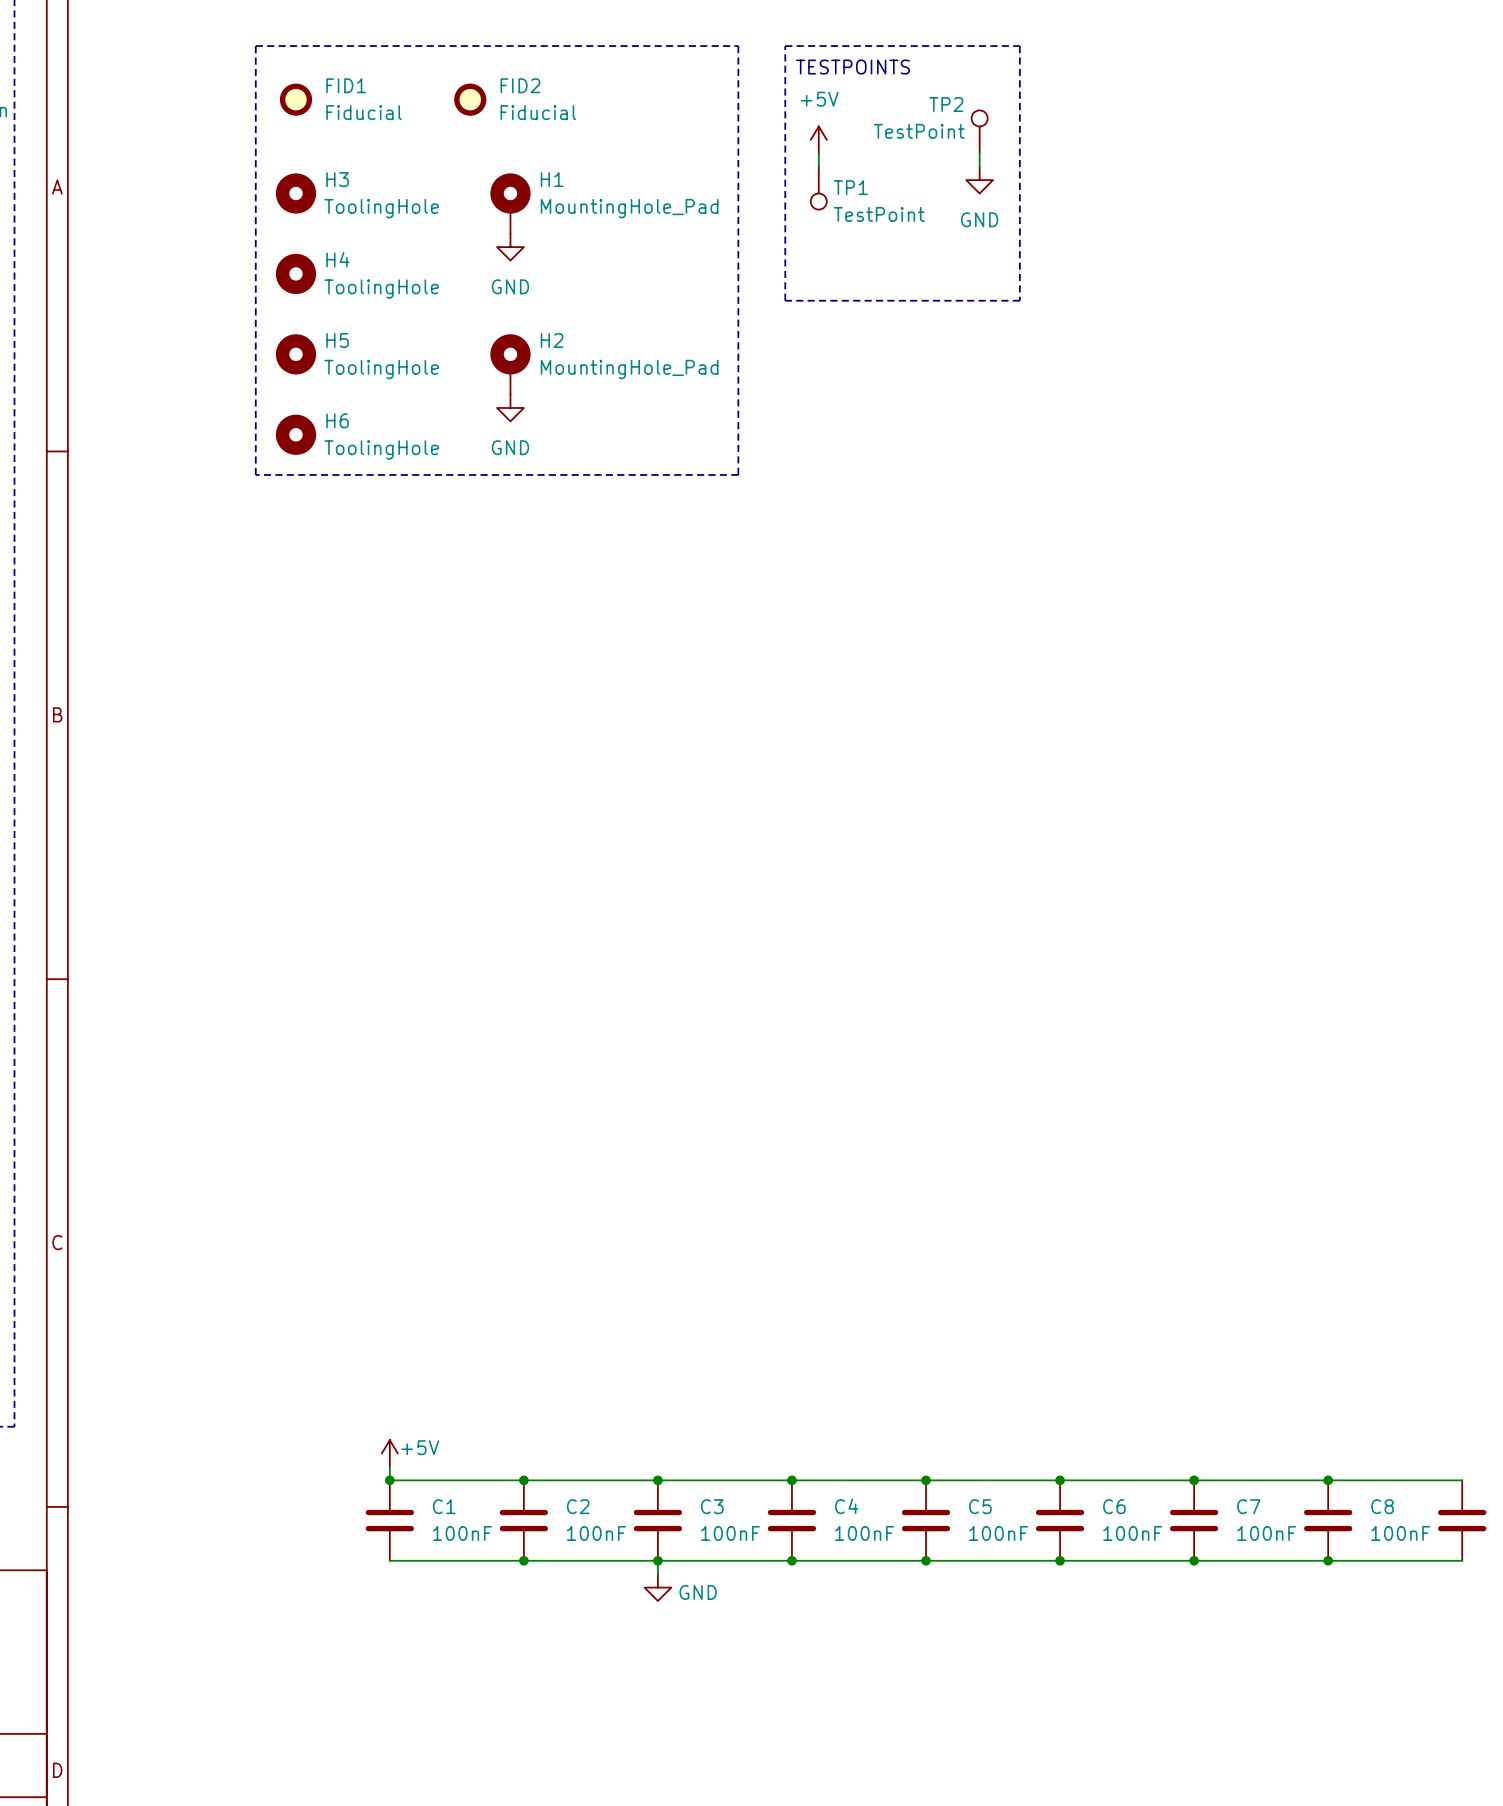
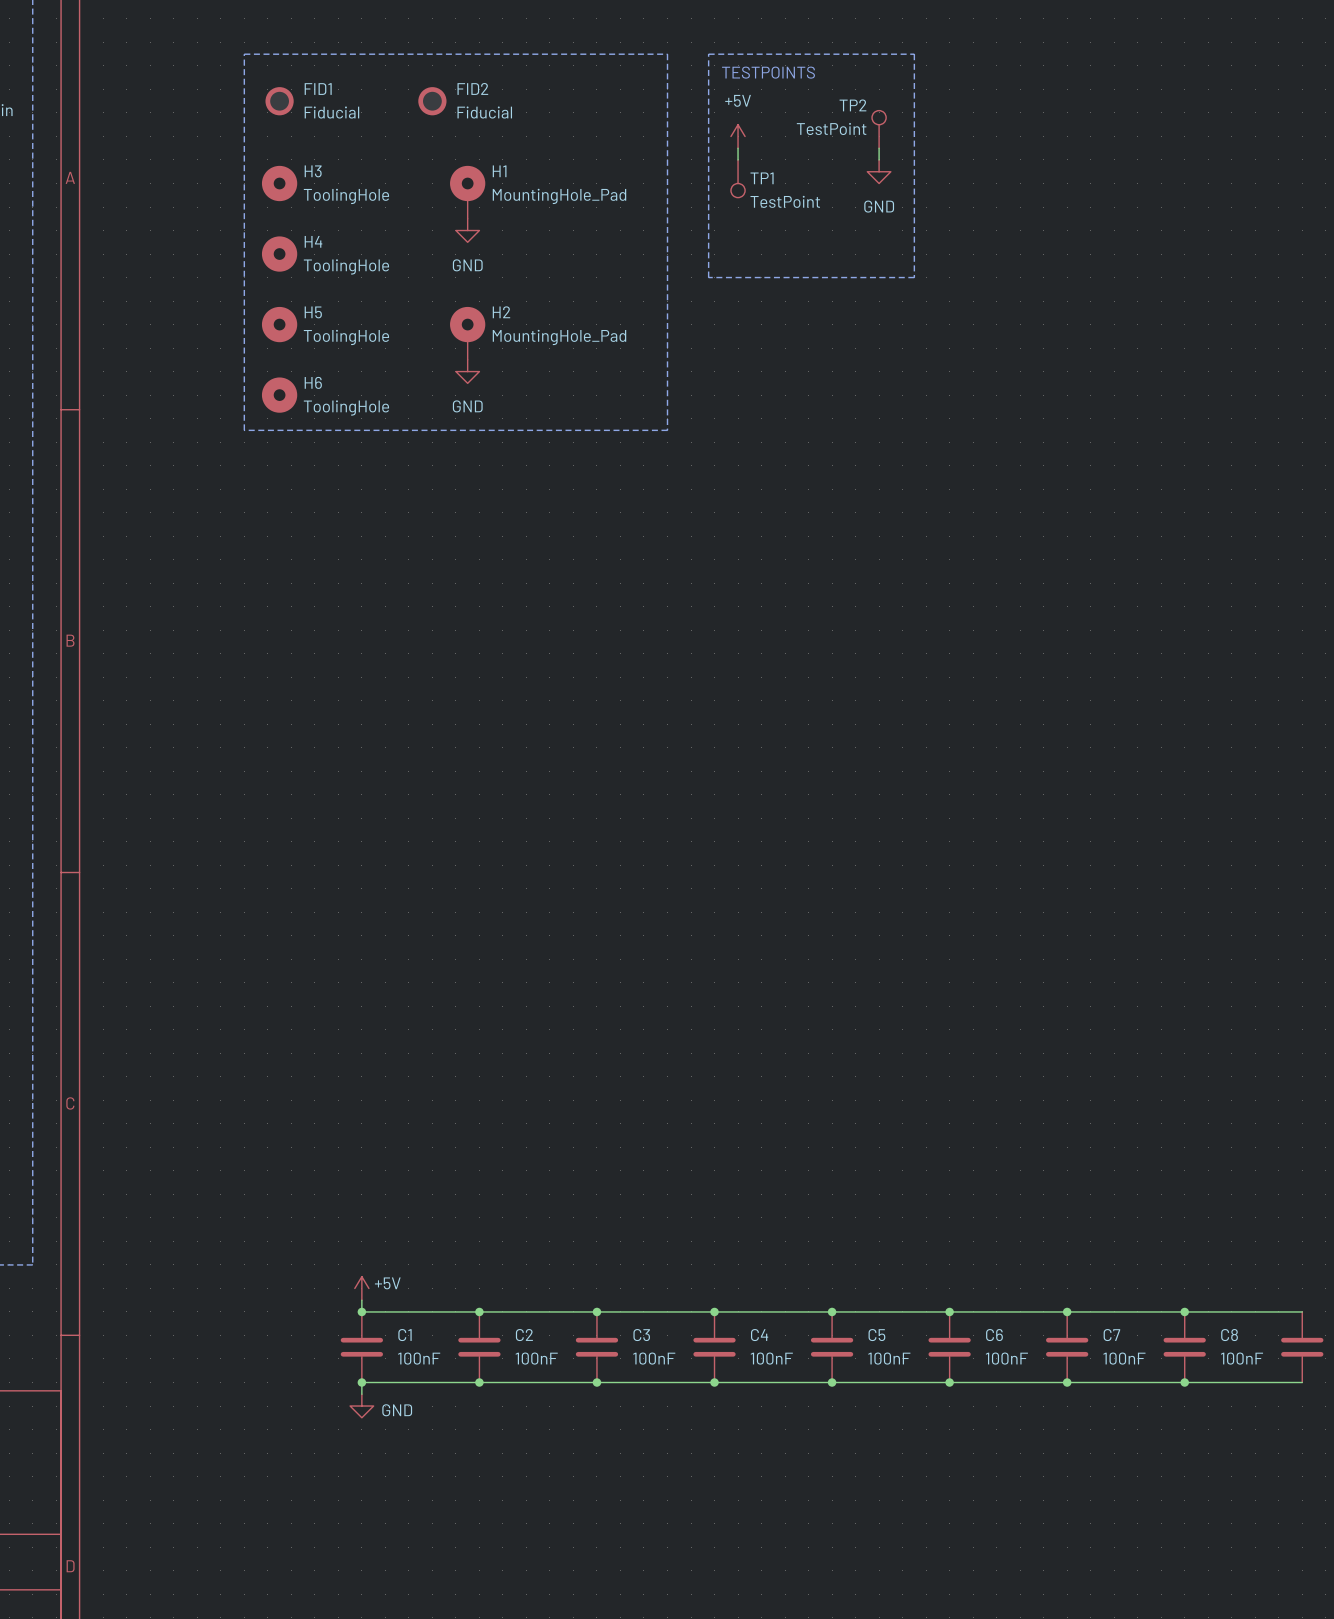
wire: none -> (361, 1382) (361, 1394)
junction: none -> (361, 1382)
wire: (657, 1560) (657, 1574) -> none
power symbol: none -> GND (361, 1406)
power symbol: GND (657, 1587) -> none

